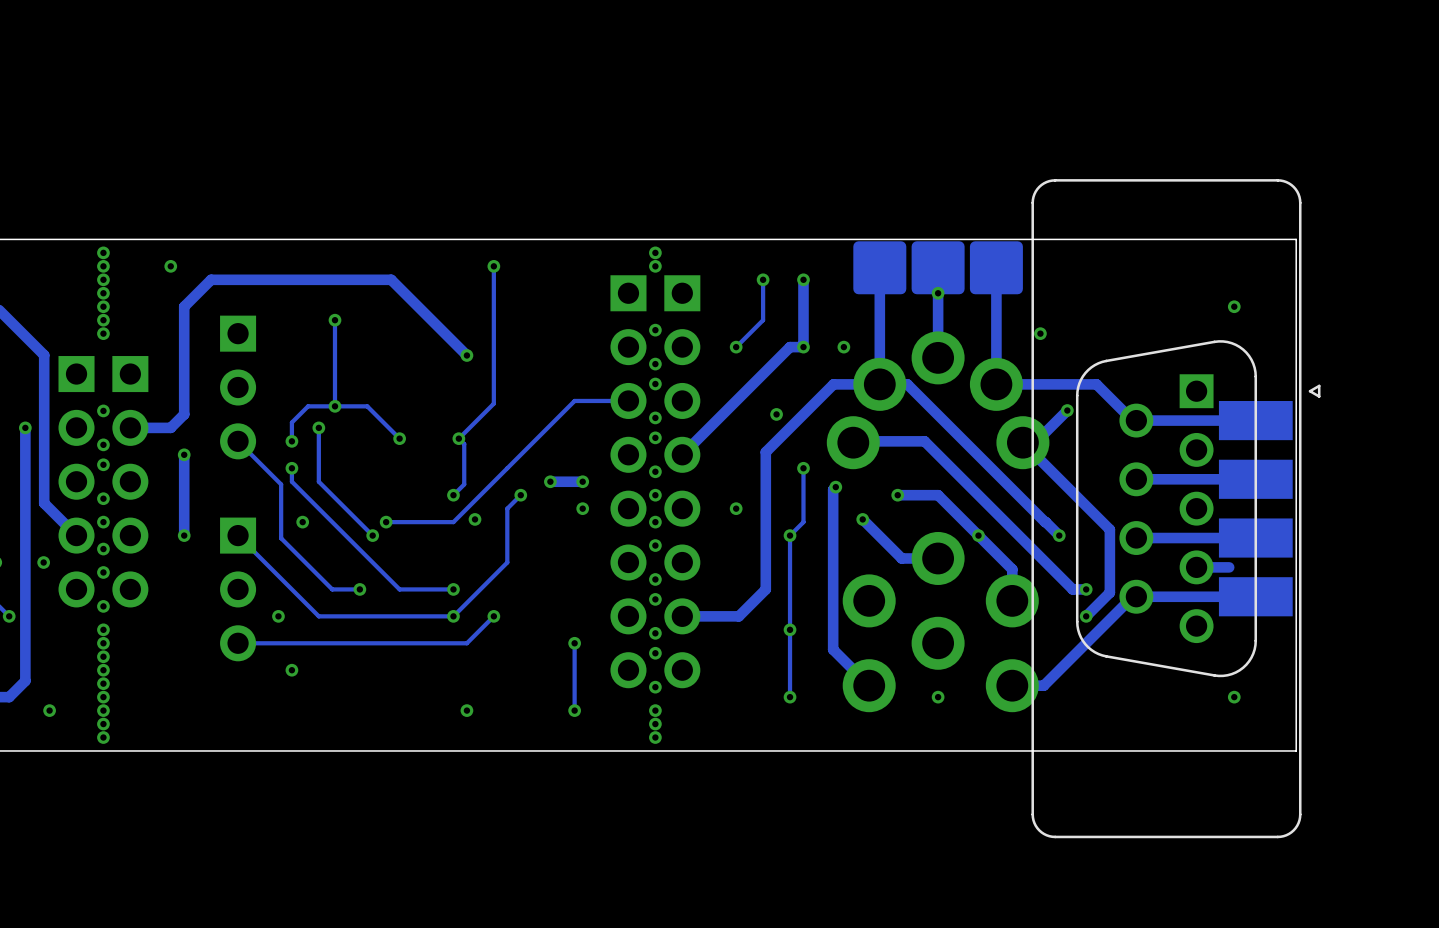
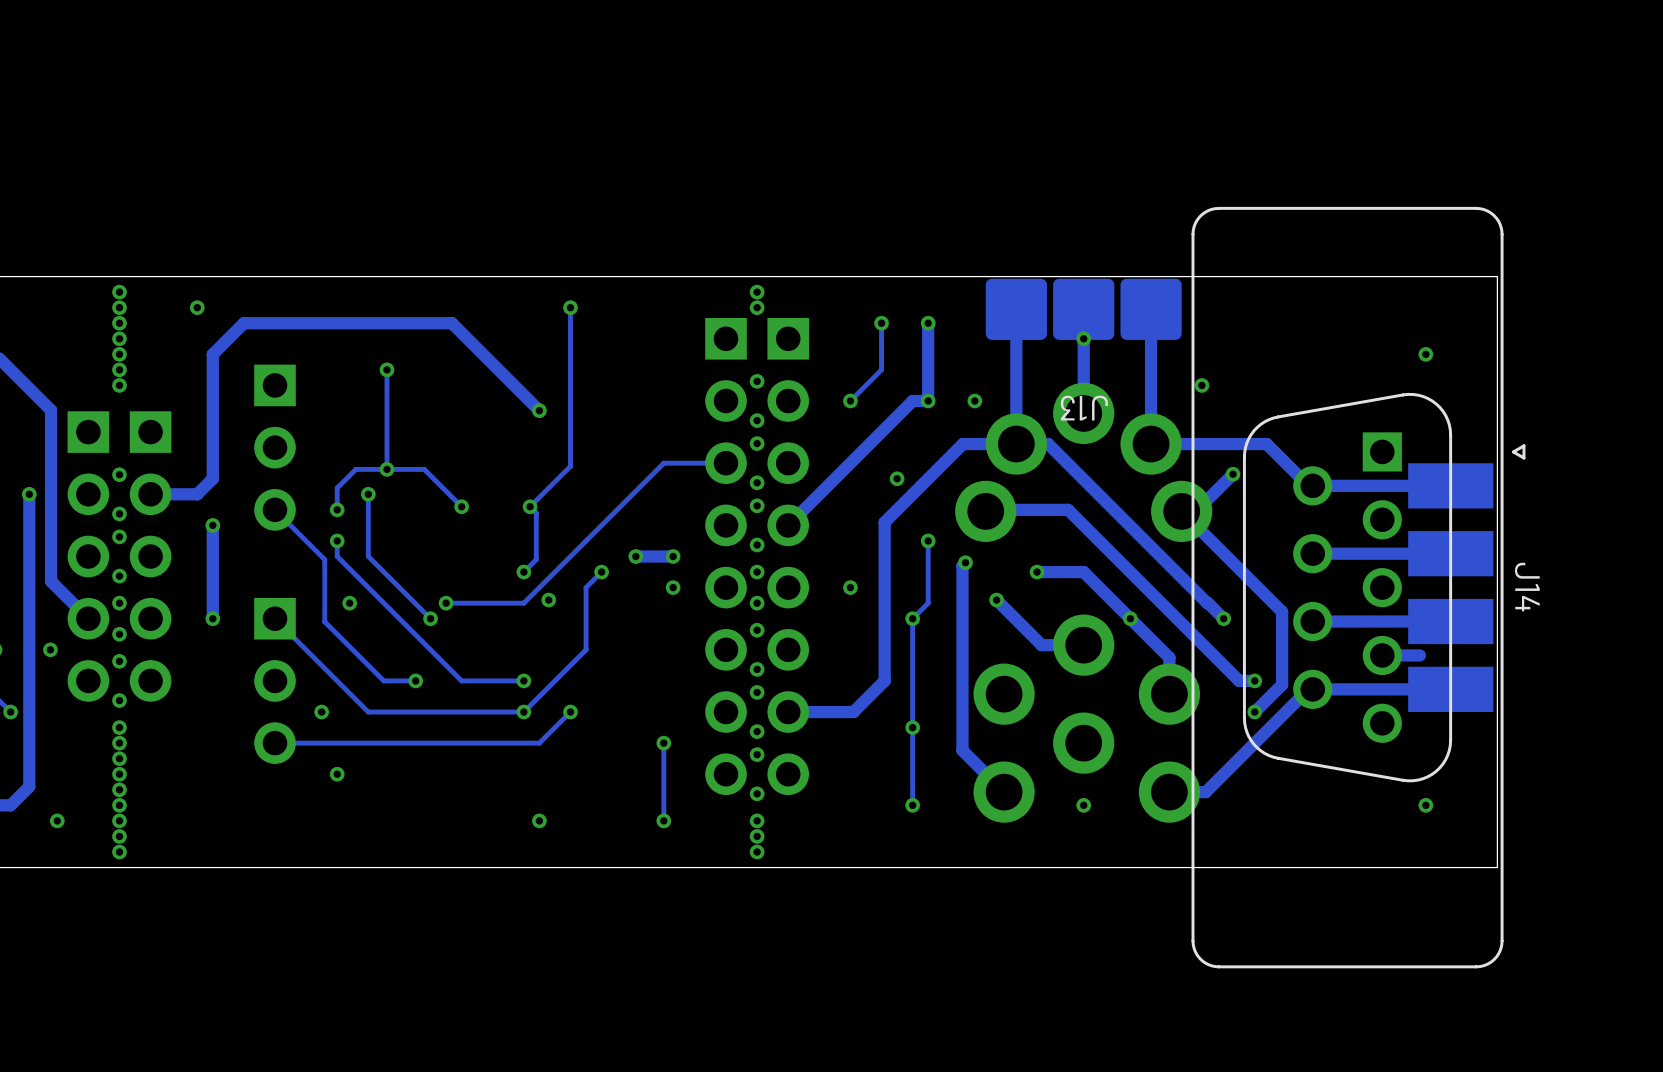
J13 name: none -> J13 (1084, 408)
J14 name: none -> J14 (1527, 587)

